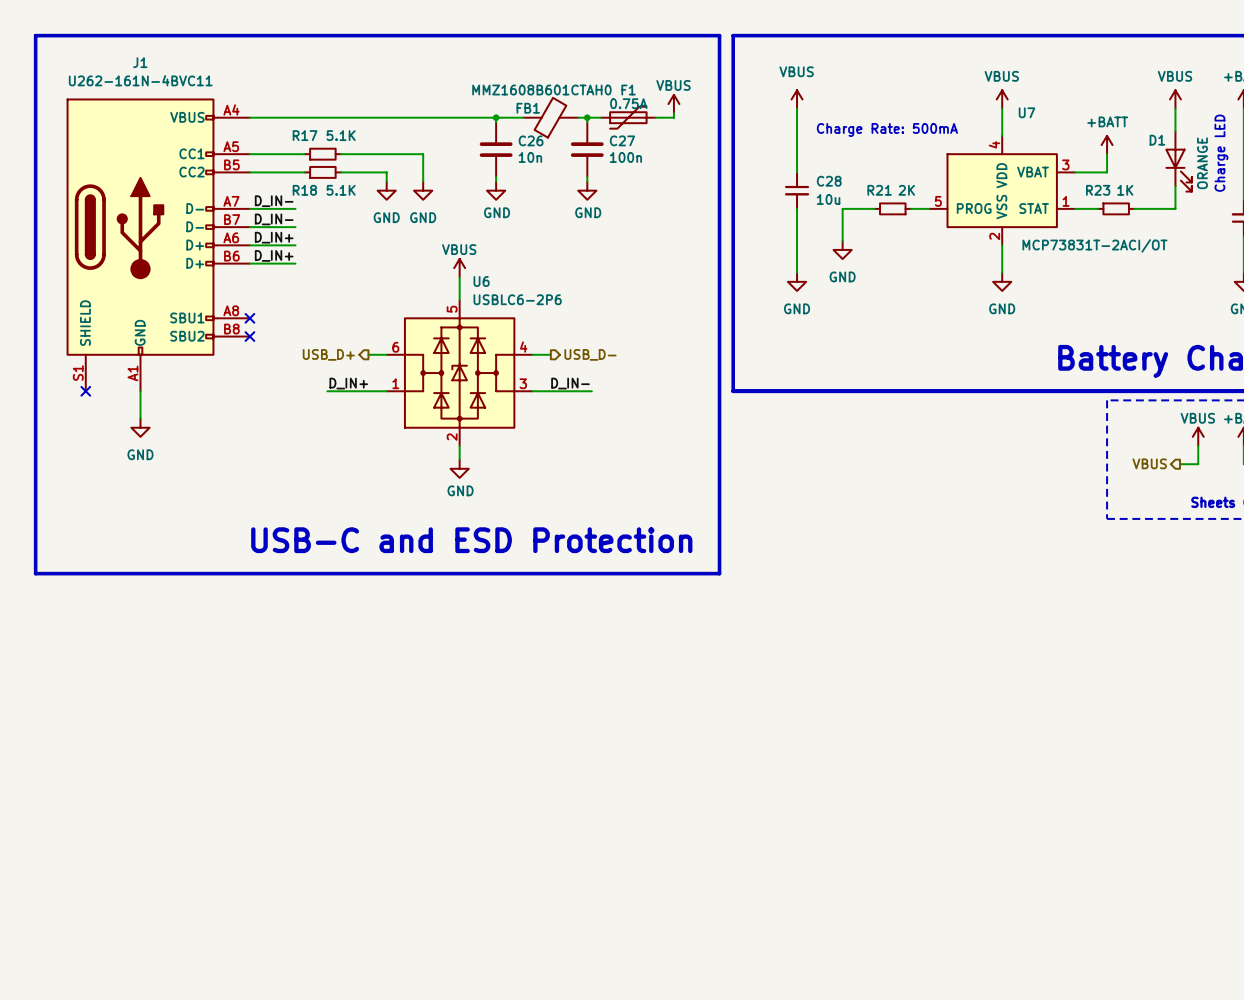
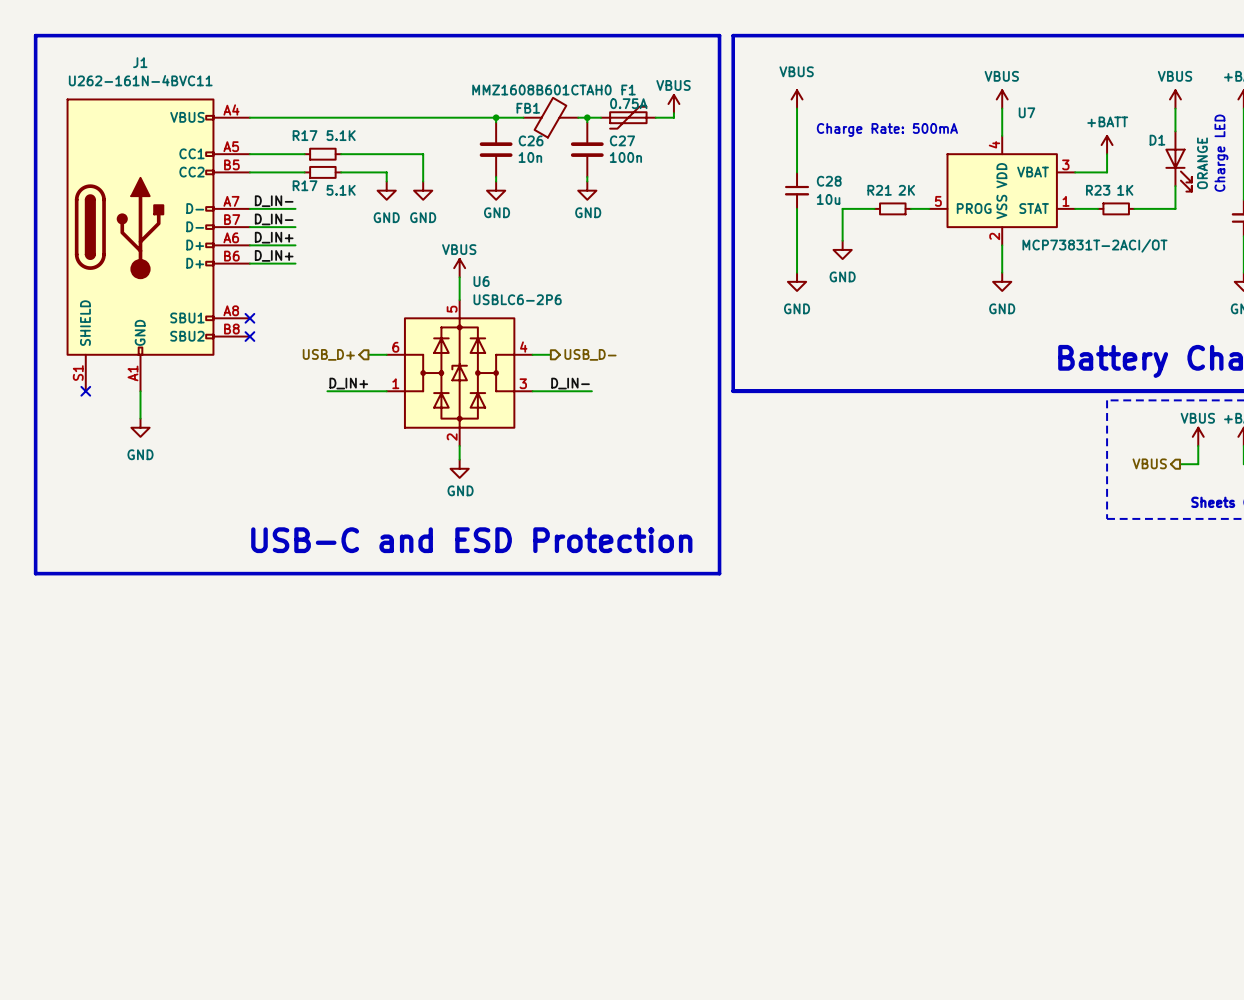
R18 name: R18 (304, 190) -> R17 (305, 185)

